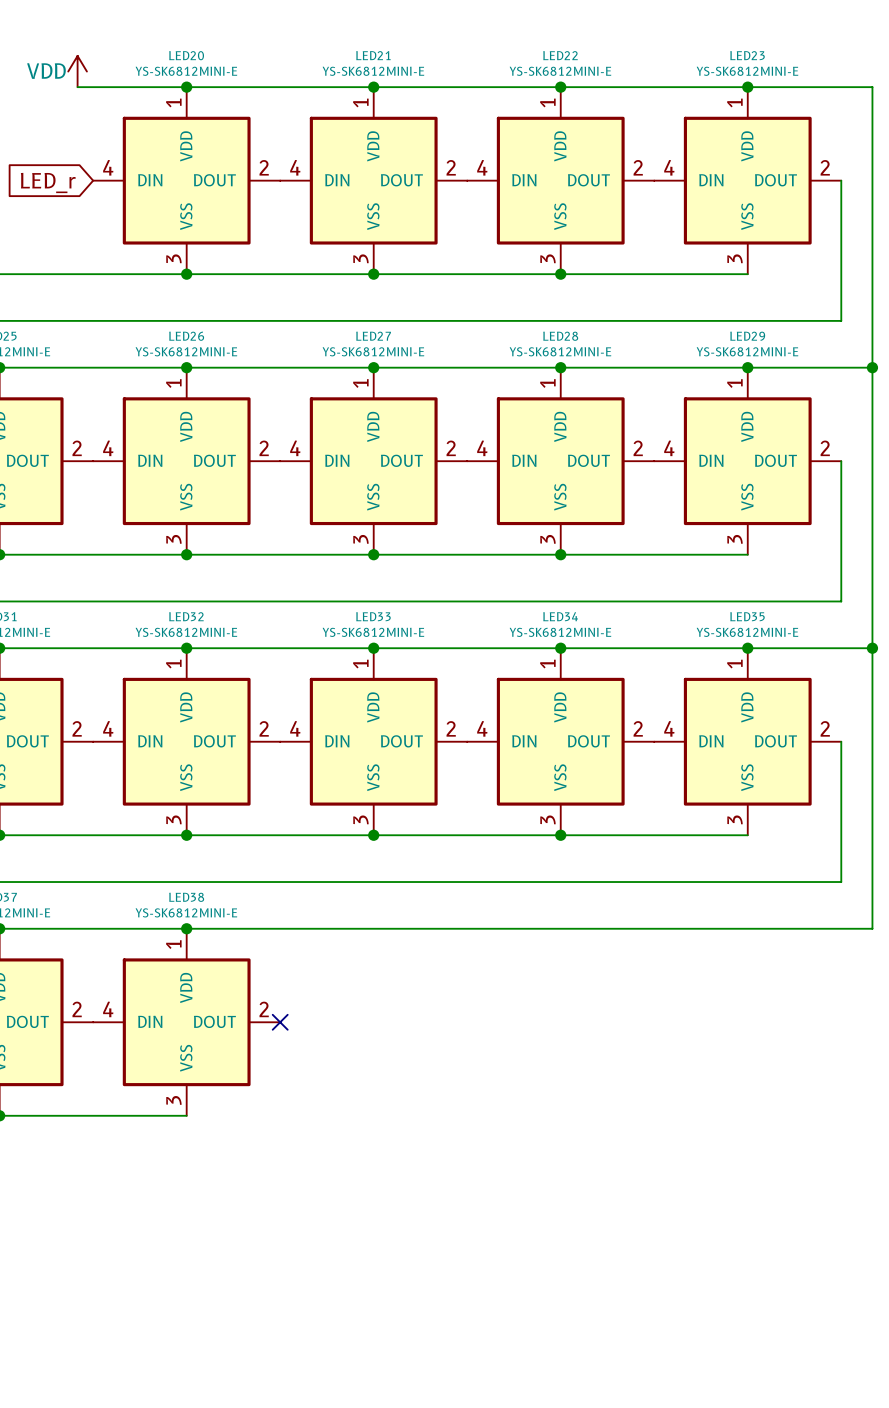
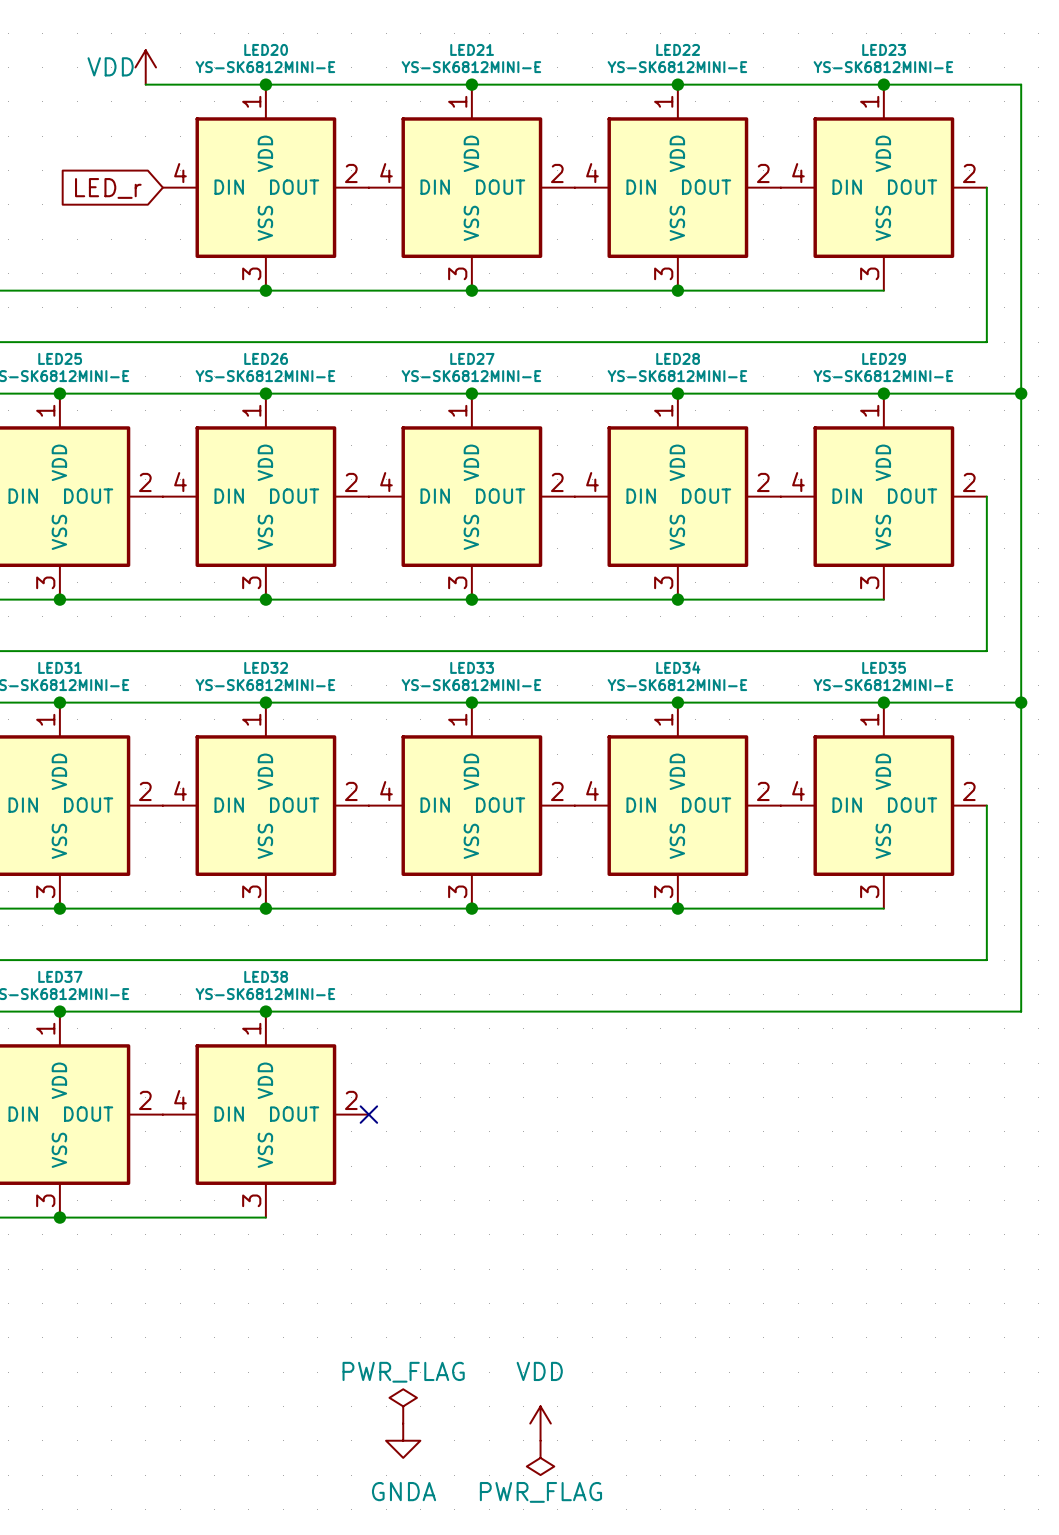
power symbol: none -> PWR_FLAG (403, 1406)
power symbol: none -> VDD (540, 1423)
power symbol: none -> GNDA (403, 1440)
power symbol: none -> PWR_FLAG (540, 1457)

